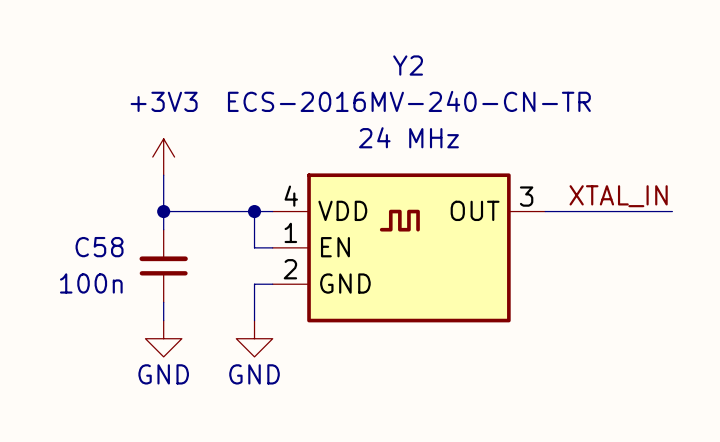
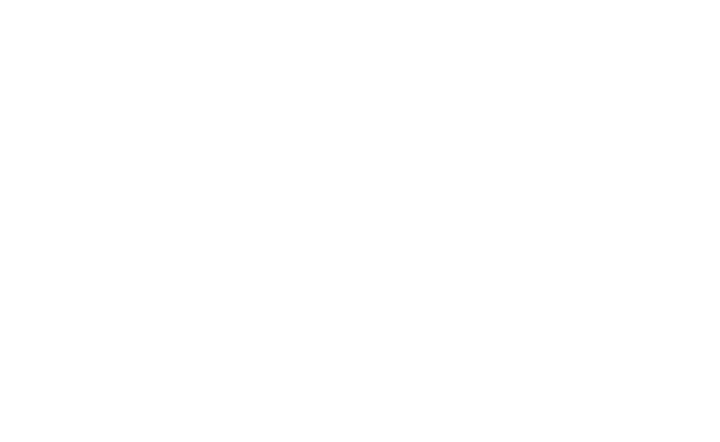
power symbol: +3V3 (163, 157) -> none
wire: (163, 175) (163, 229) -> none
label: XTAL_IN (618, 196) -> none
wire: (163, 211) (272, 211) -> none
junction: (163, 211) -> none
wire: (254, 211) (254, 247) (272, 247) -> none
junction: (254, 211) -> none
wire: (545, 211) (672, 211) -> none
Y2: (408, 247) -> none
C58: (163, 266) -> none
wire: (272, 284) (254, 284) (254, 320) -> none
wire: (163, 302) (163, 320) -> none
power symbol: GND (163, 338) -> none
power symbol: GND (254, 338) -> none

